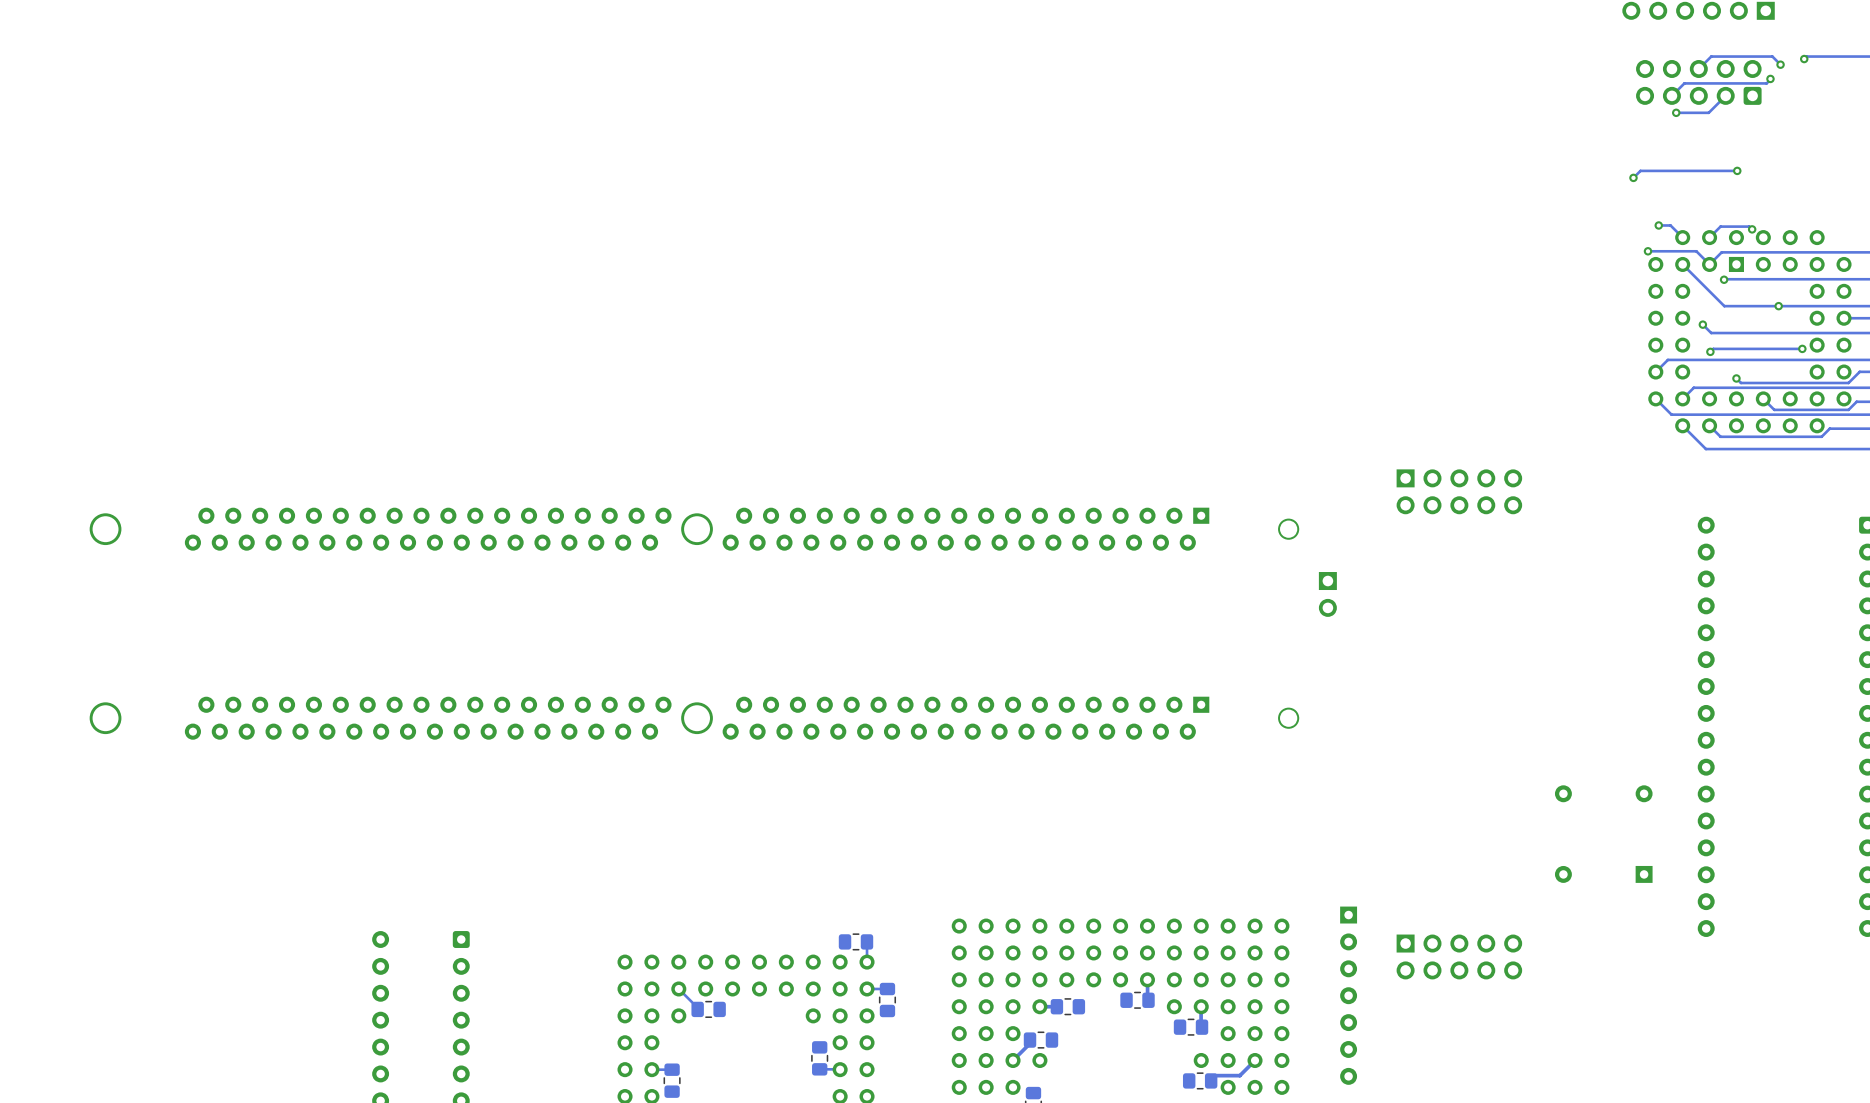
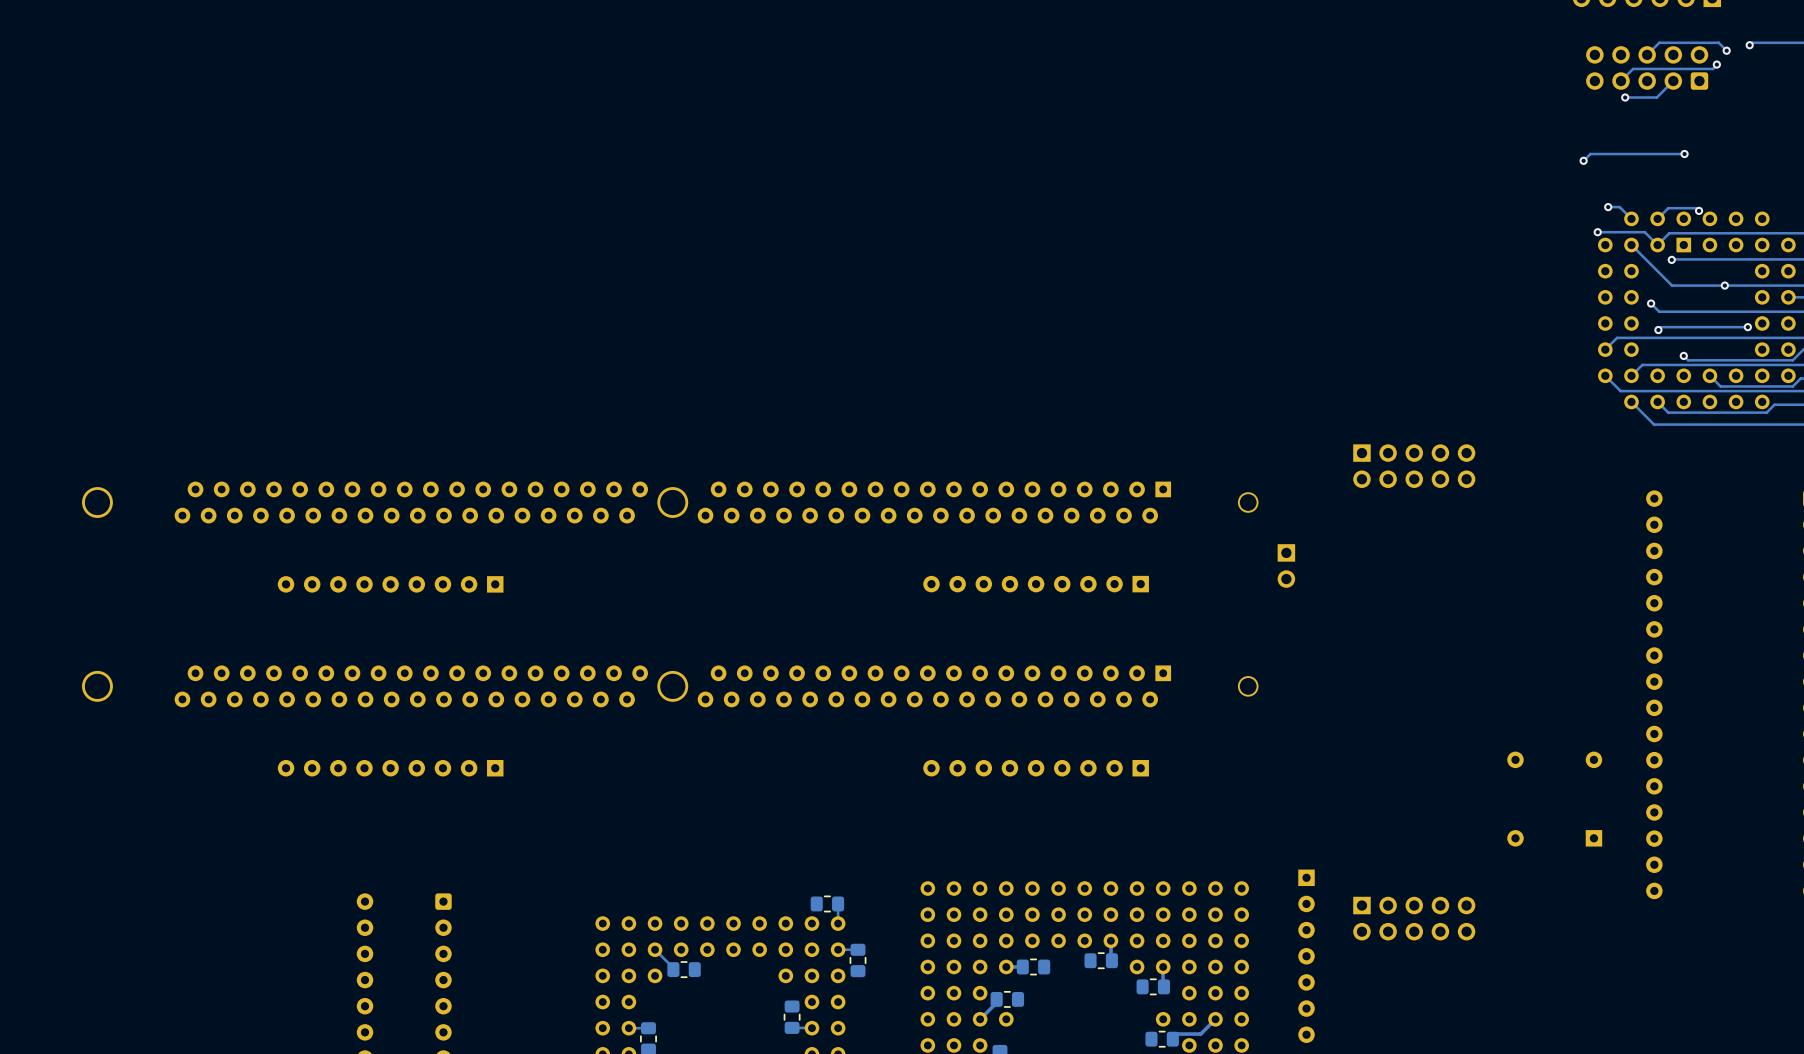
part: none -> (390, 584)
part: none -> (1036, 584)
part: none -> (390, 768)
part: none -> (1036, 768)

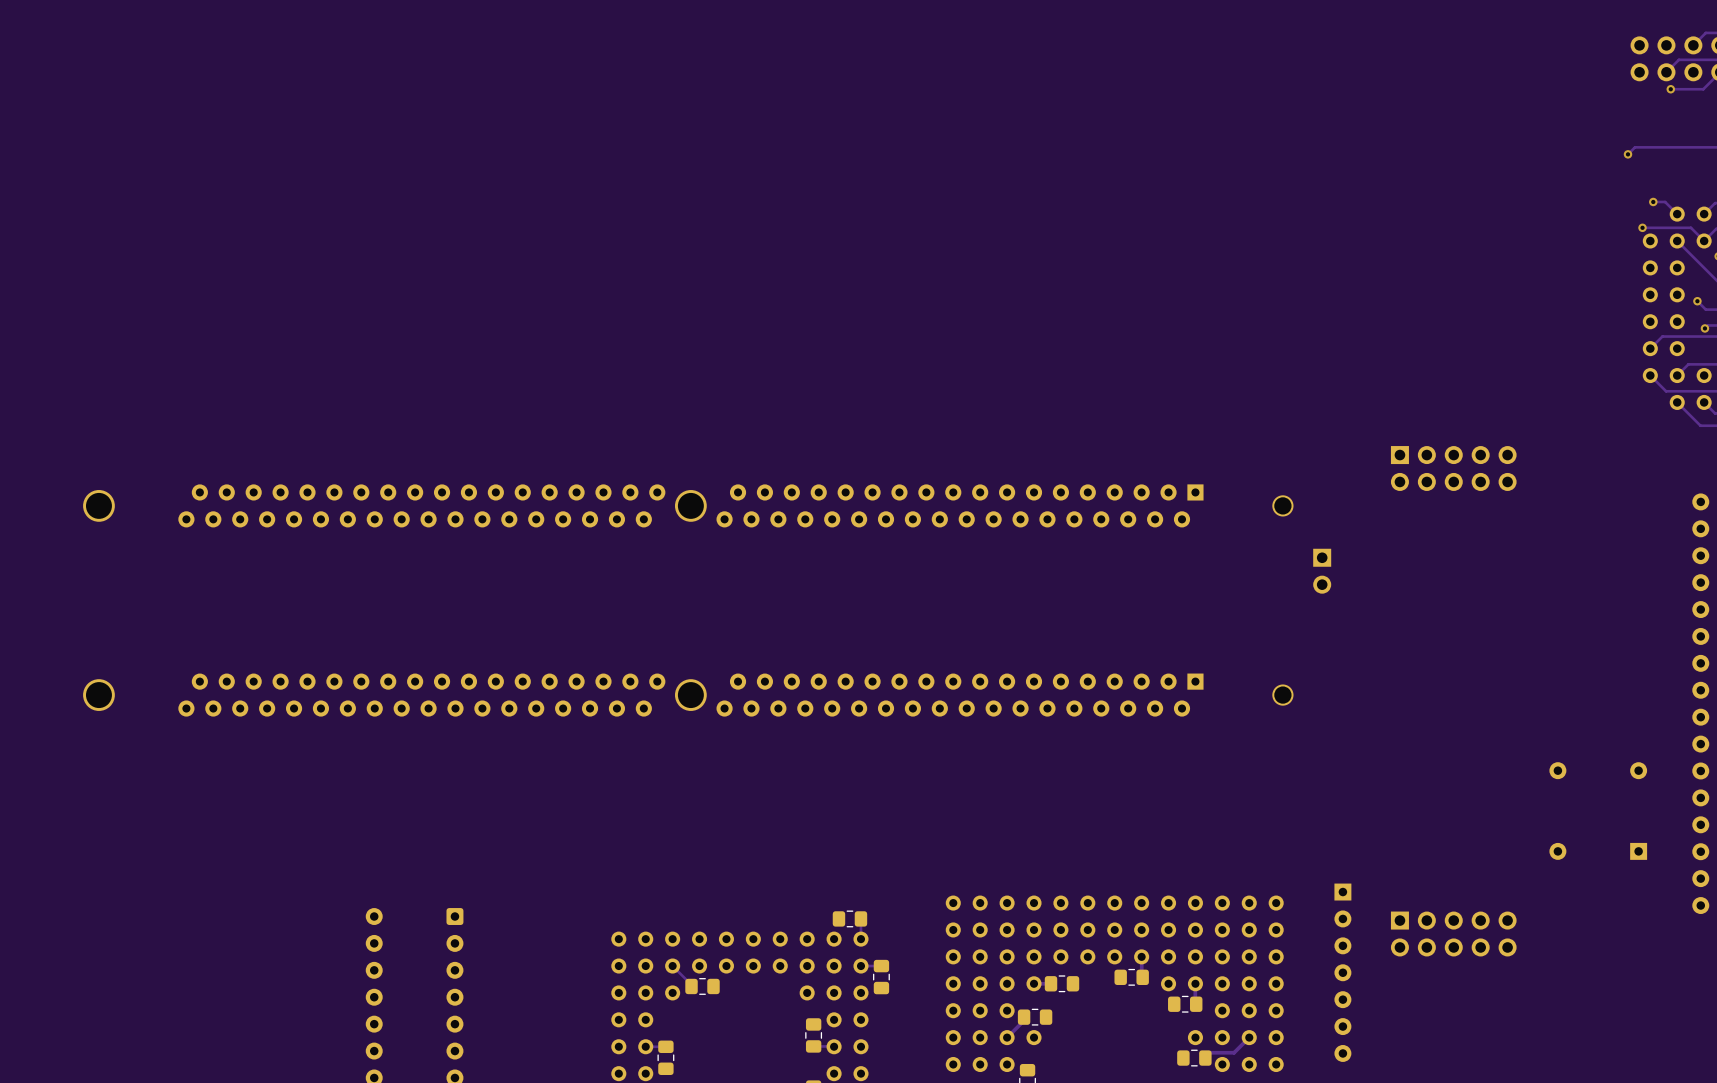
part: (390, 584) -> none
part: (1036, 584) -> none
part: (390, 768) -> none
part: (1036, 768) -> none

